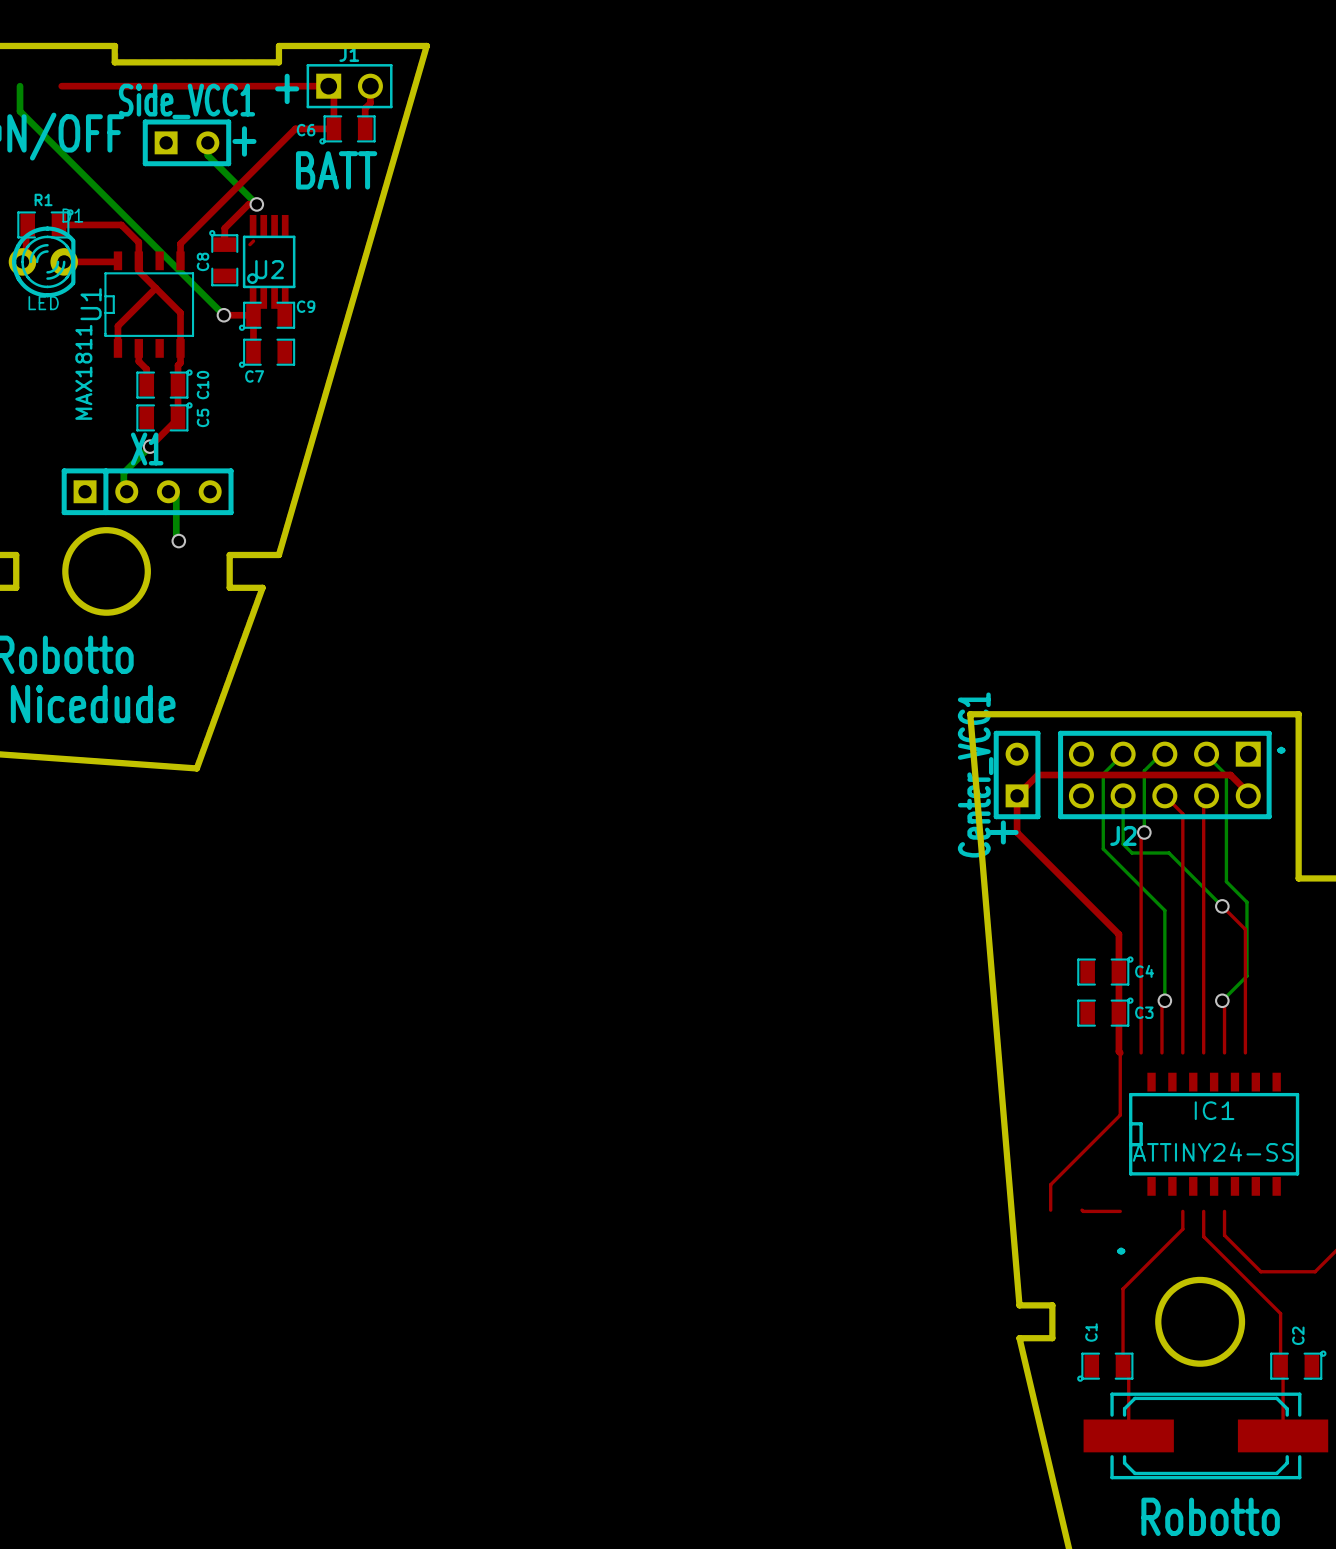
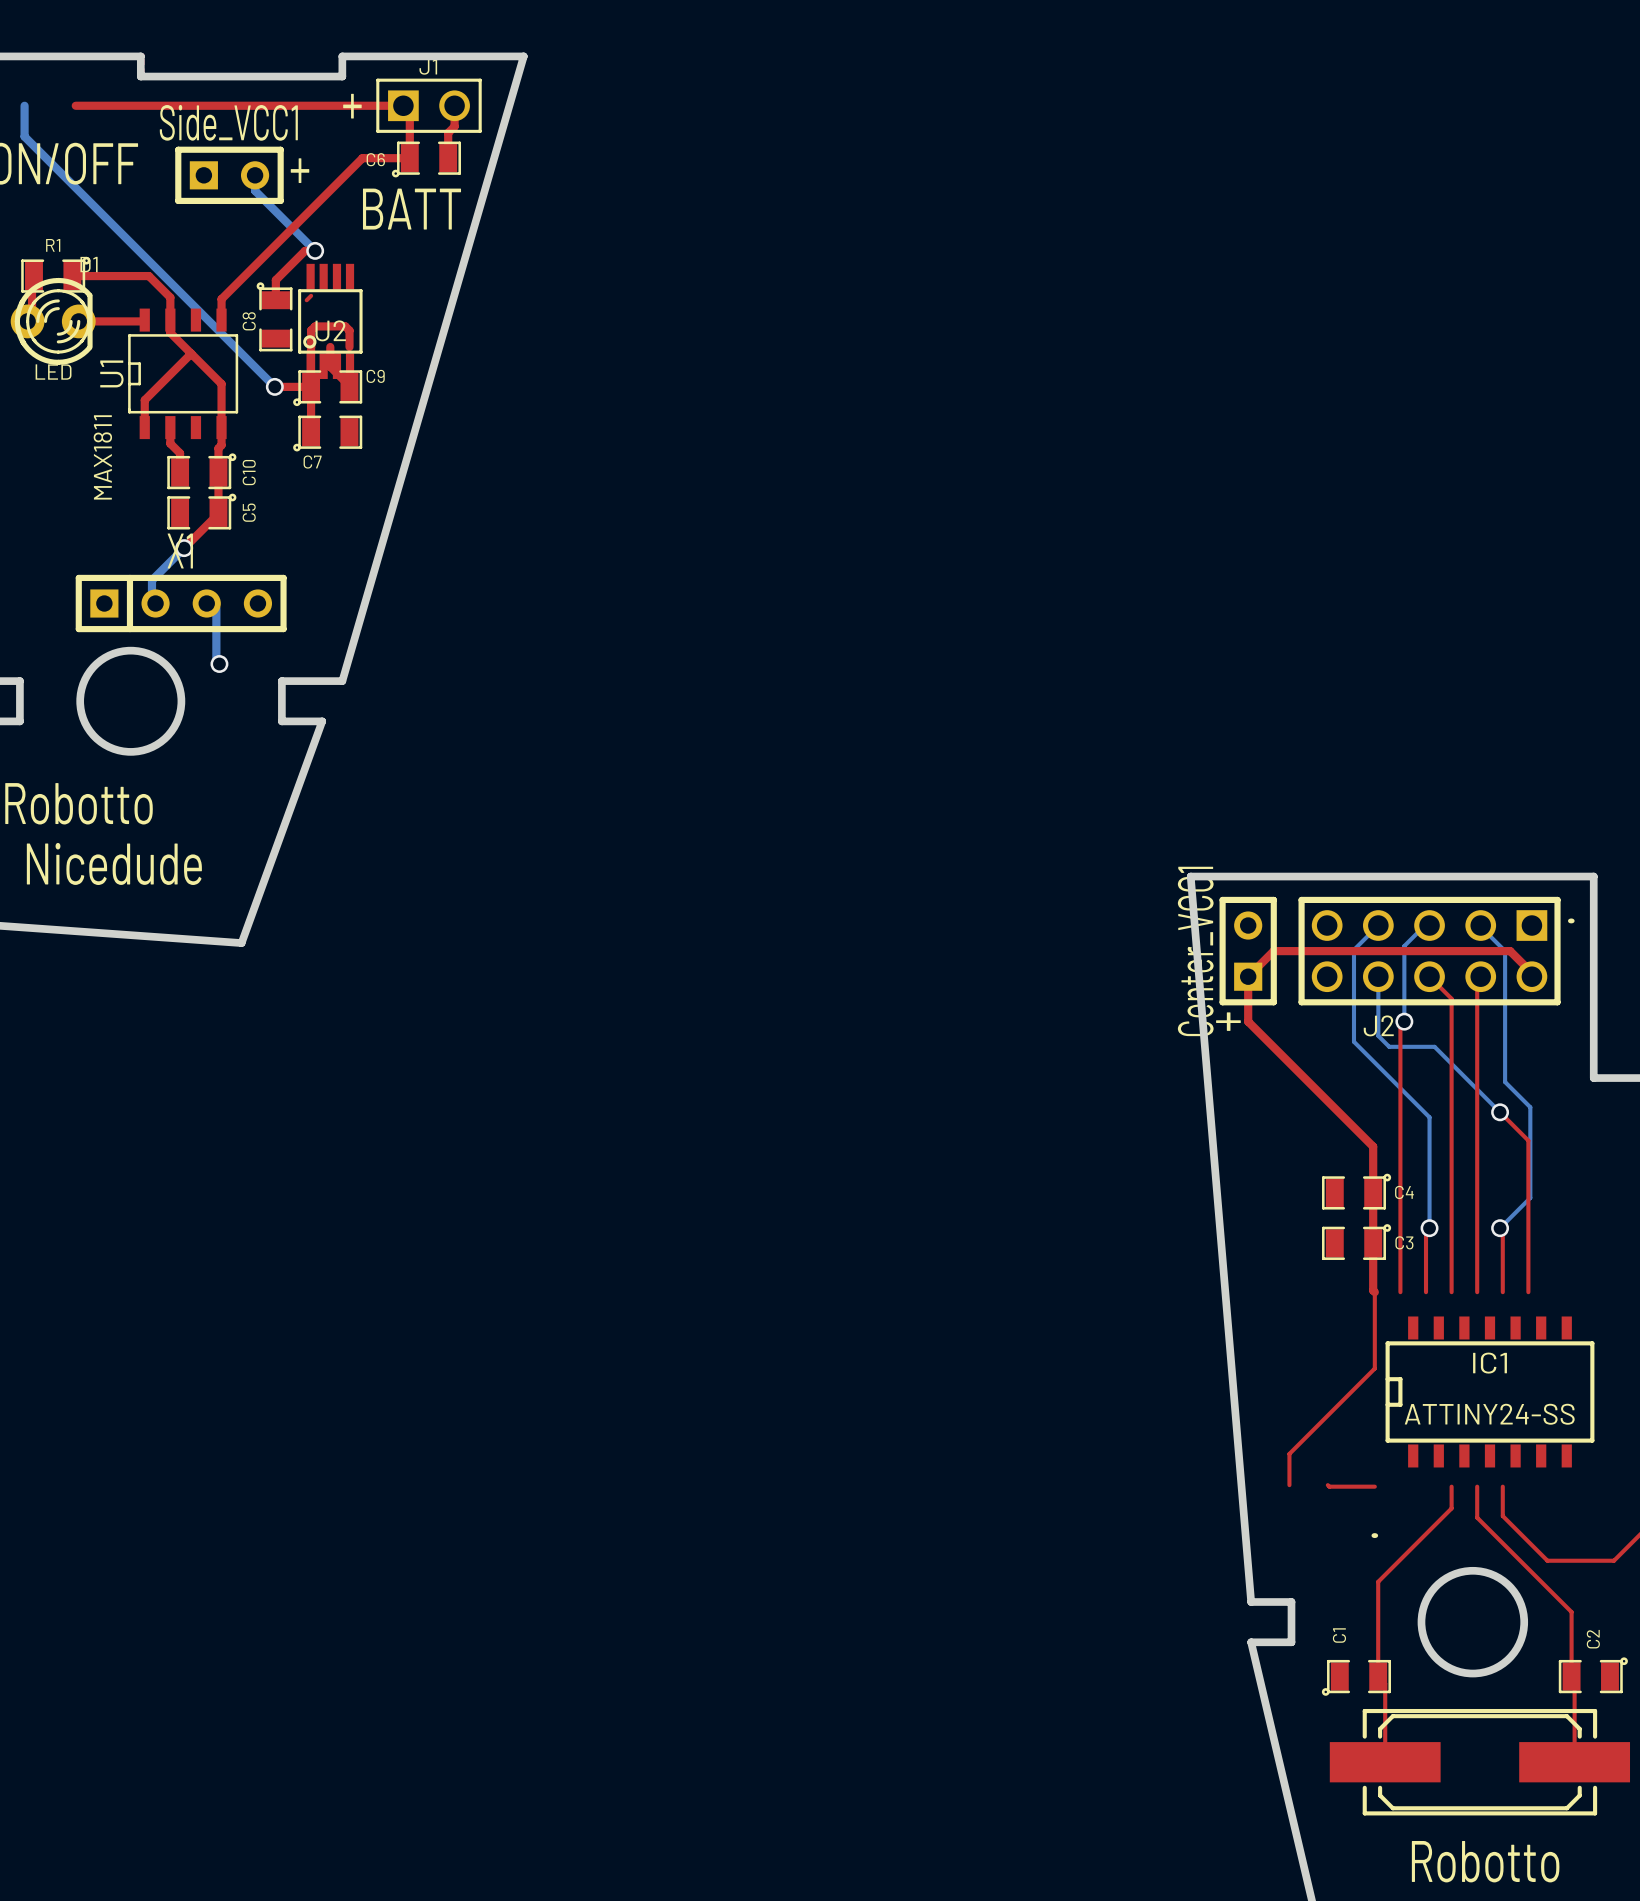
top track: none -> (330, 347) (330, 366) (349, 386)
top track: none -> (349, 347) (349, 330) (345, 326) (315, 326) (311, 330) (311, 386)

